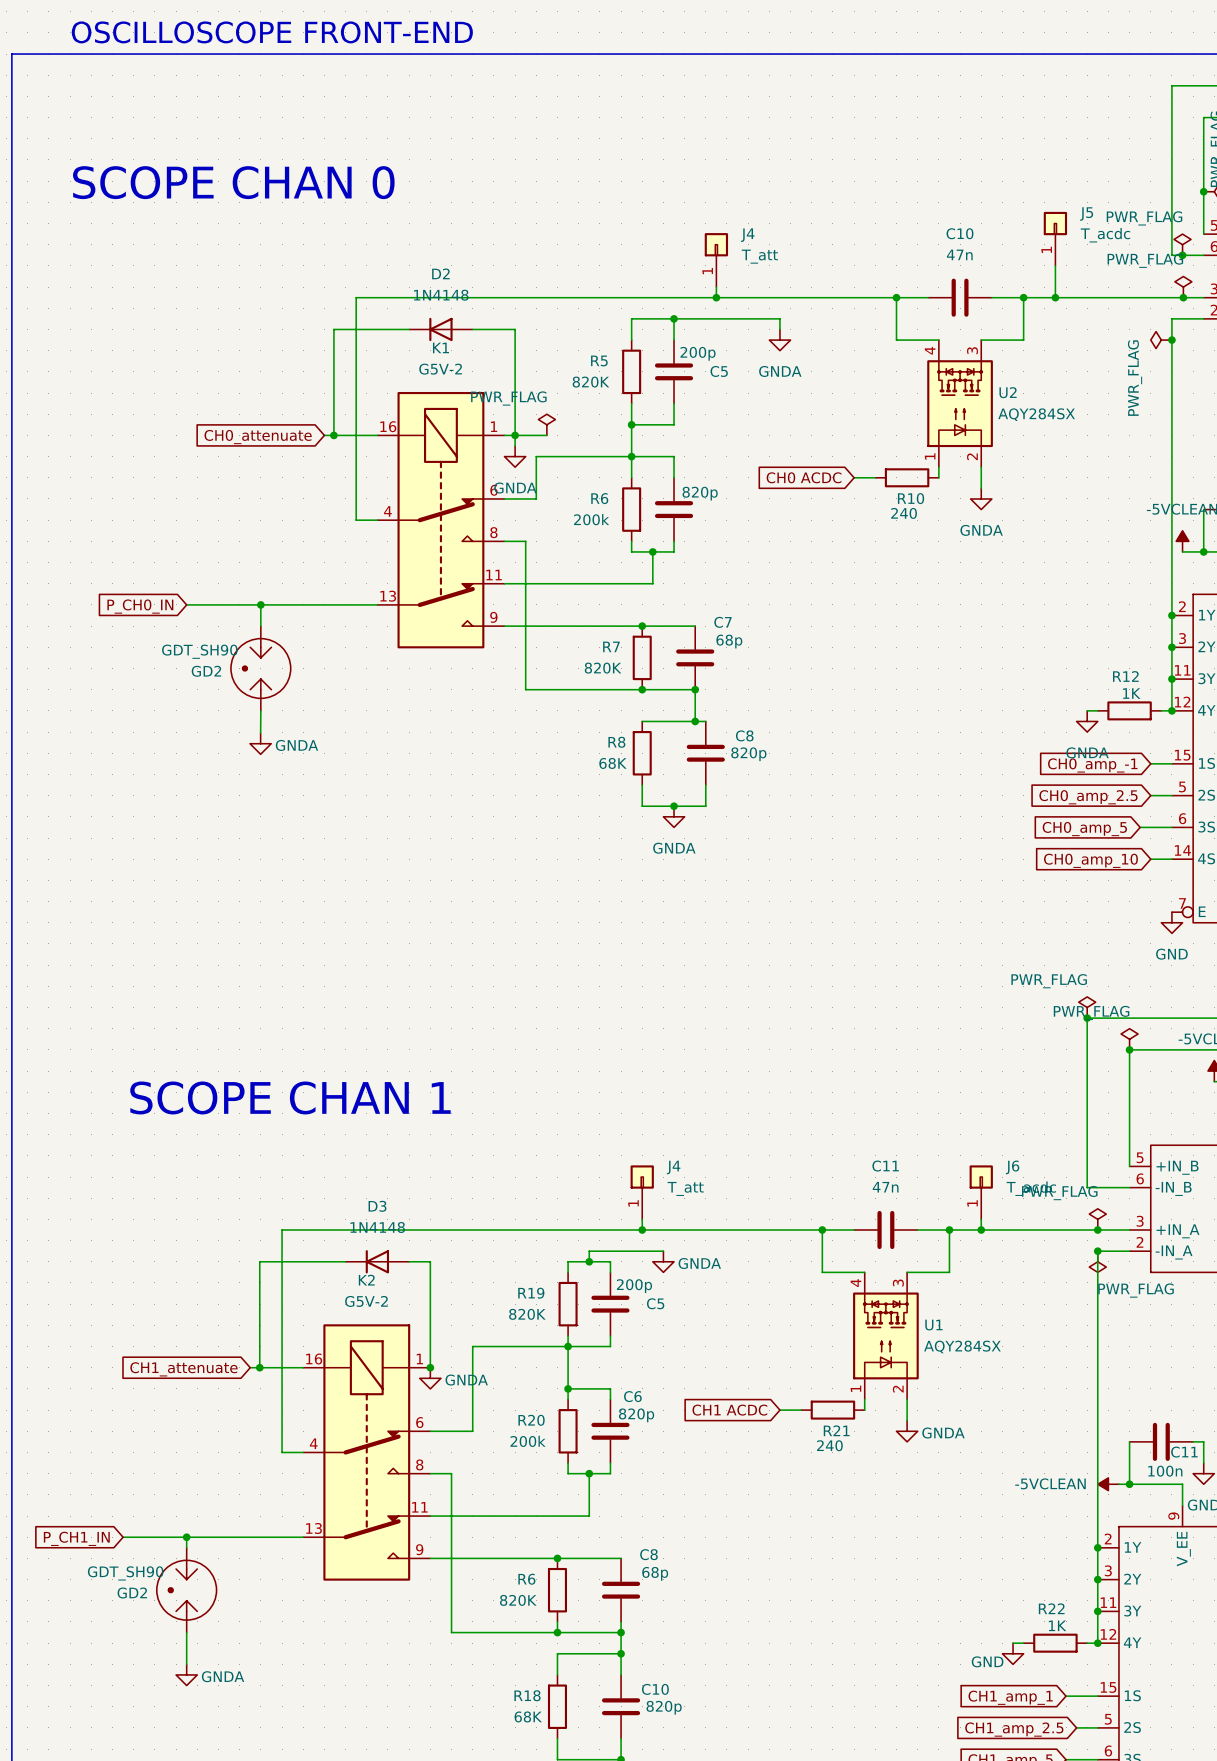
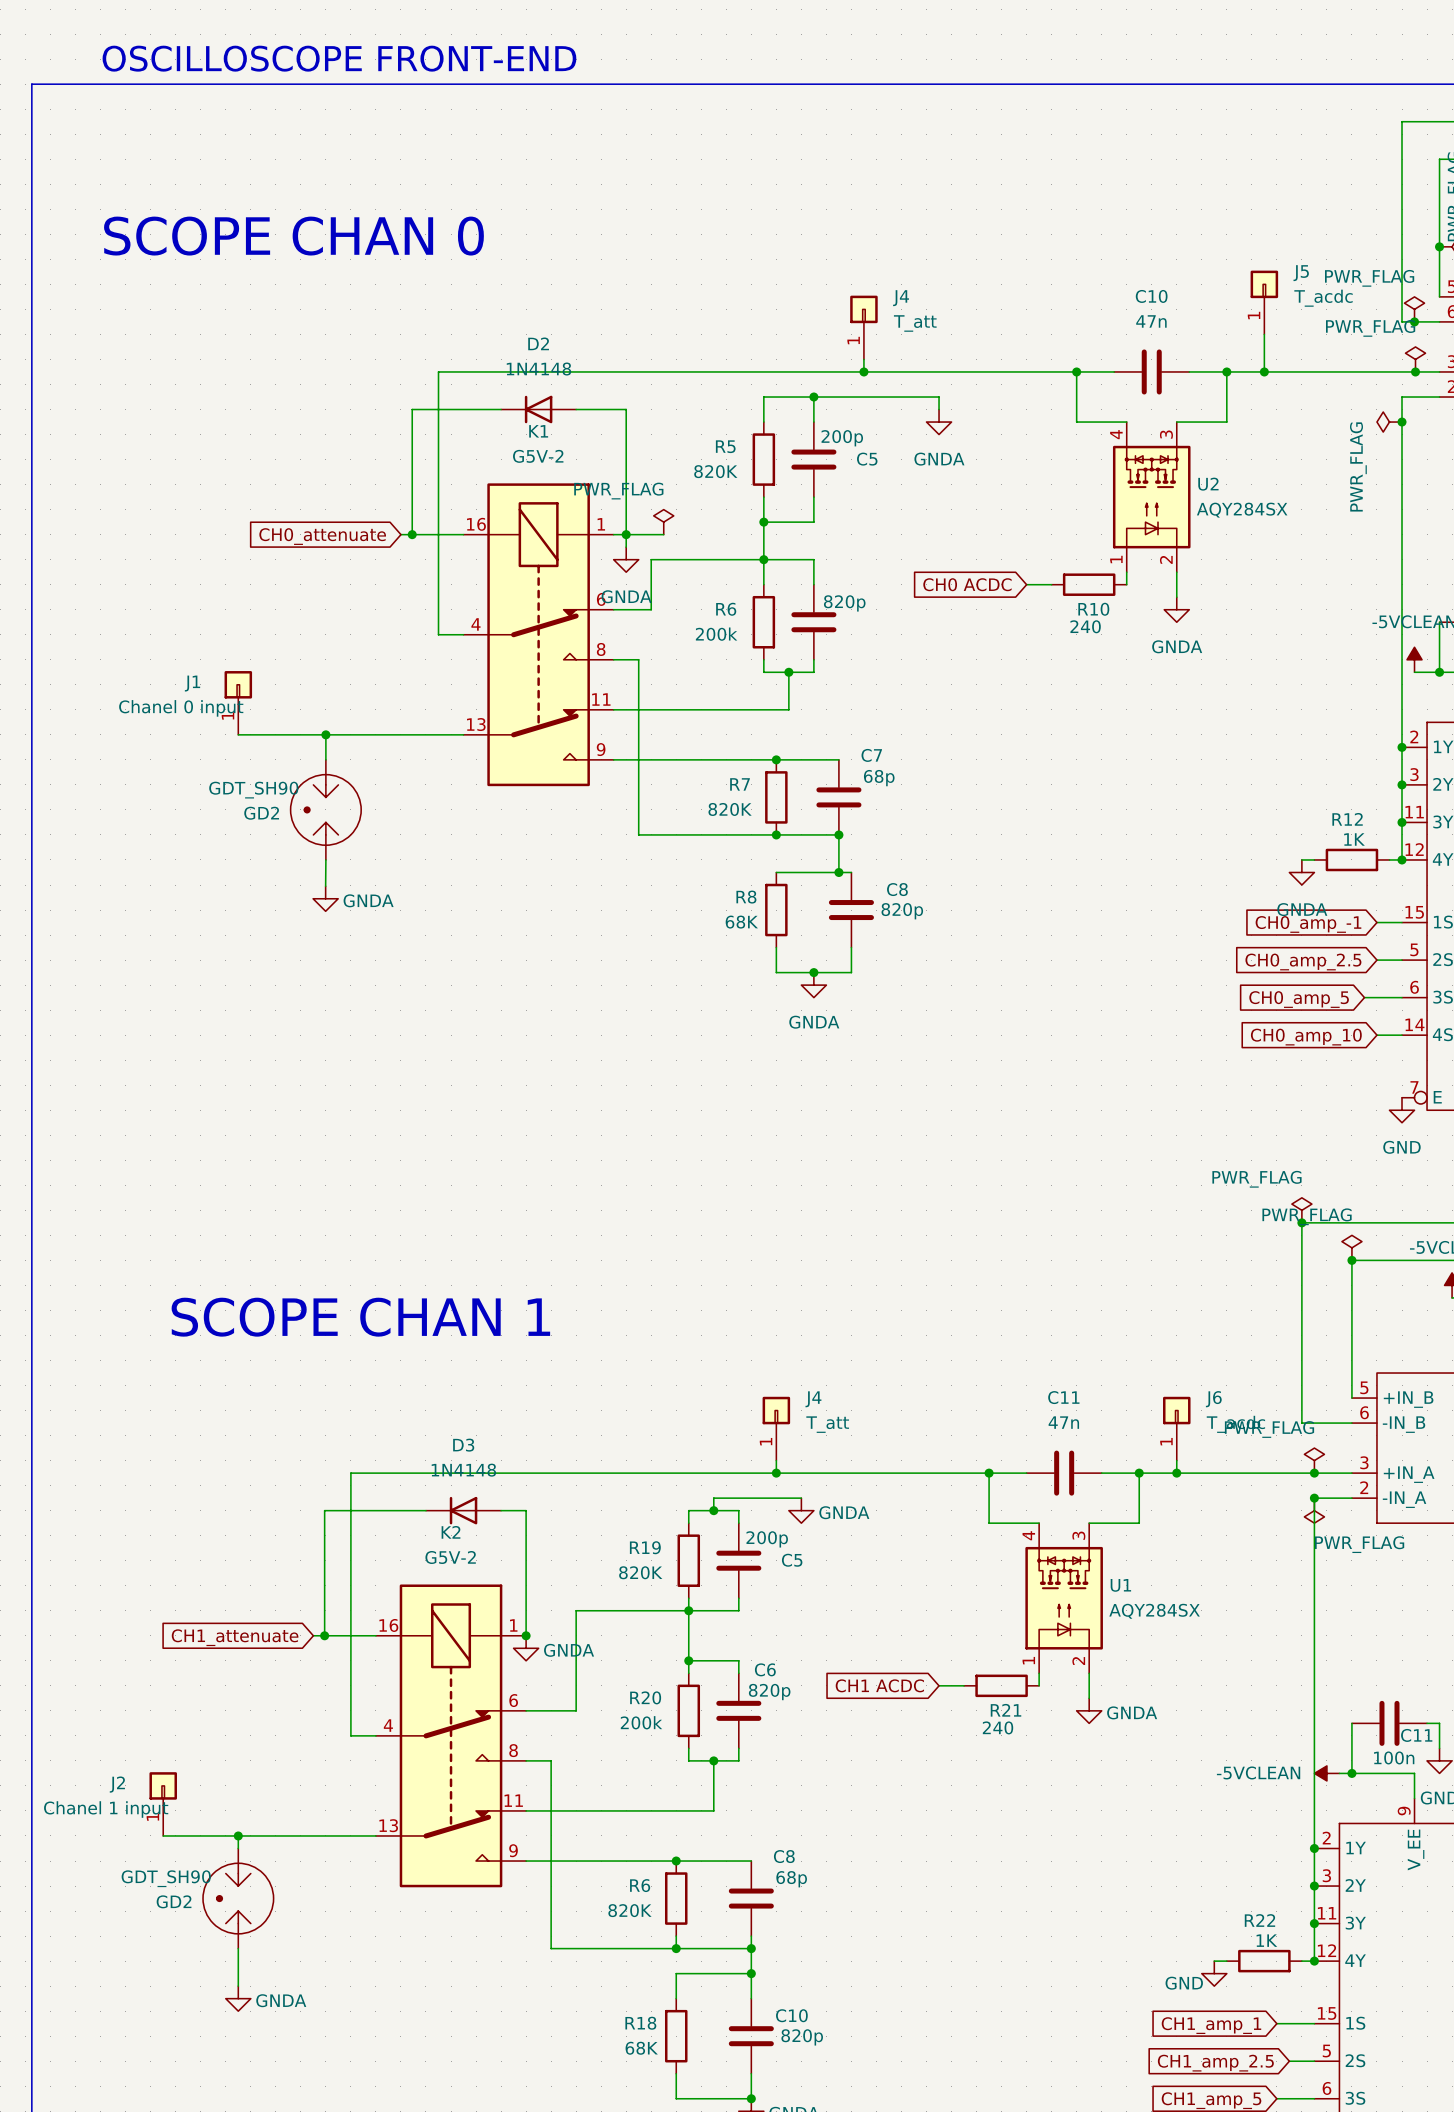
J1: none -> Chanel 0 input (238, 702)
global label: P_CH0_IN (140, 606) -> none
J2: none -> Chanel 1 input (163, 1804)
global label: P_CH1_IN (76, 1538) -> none

